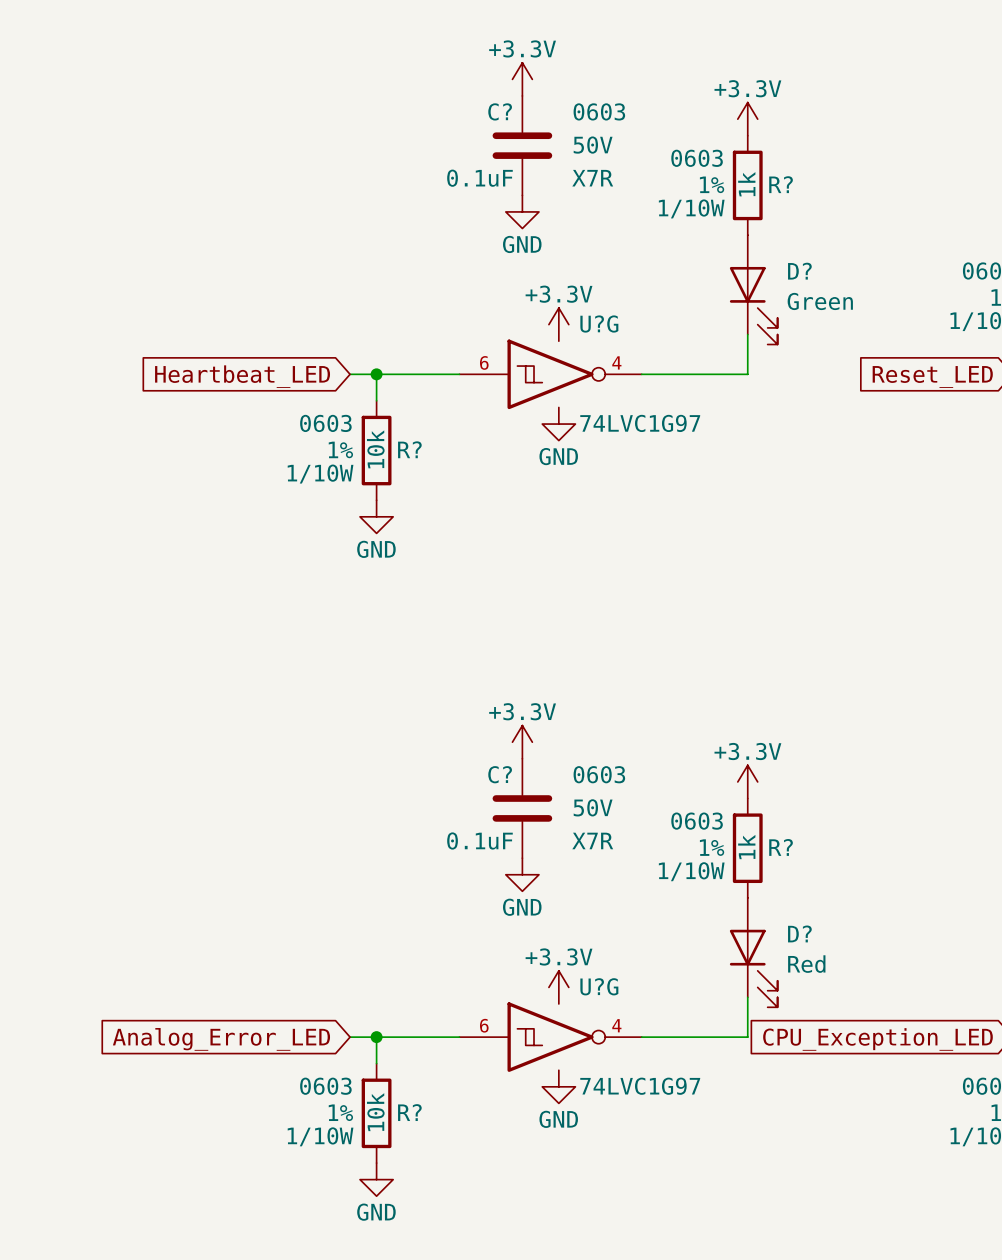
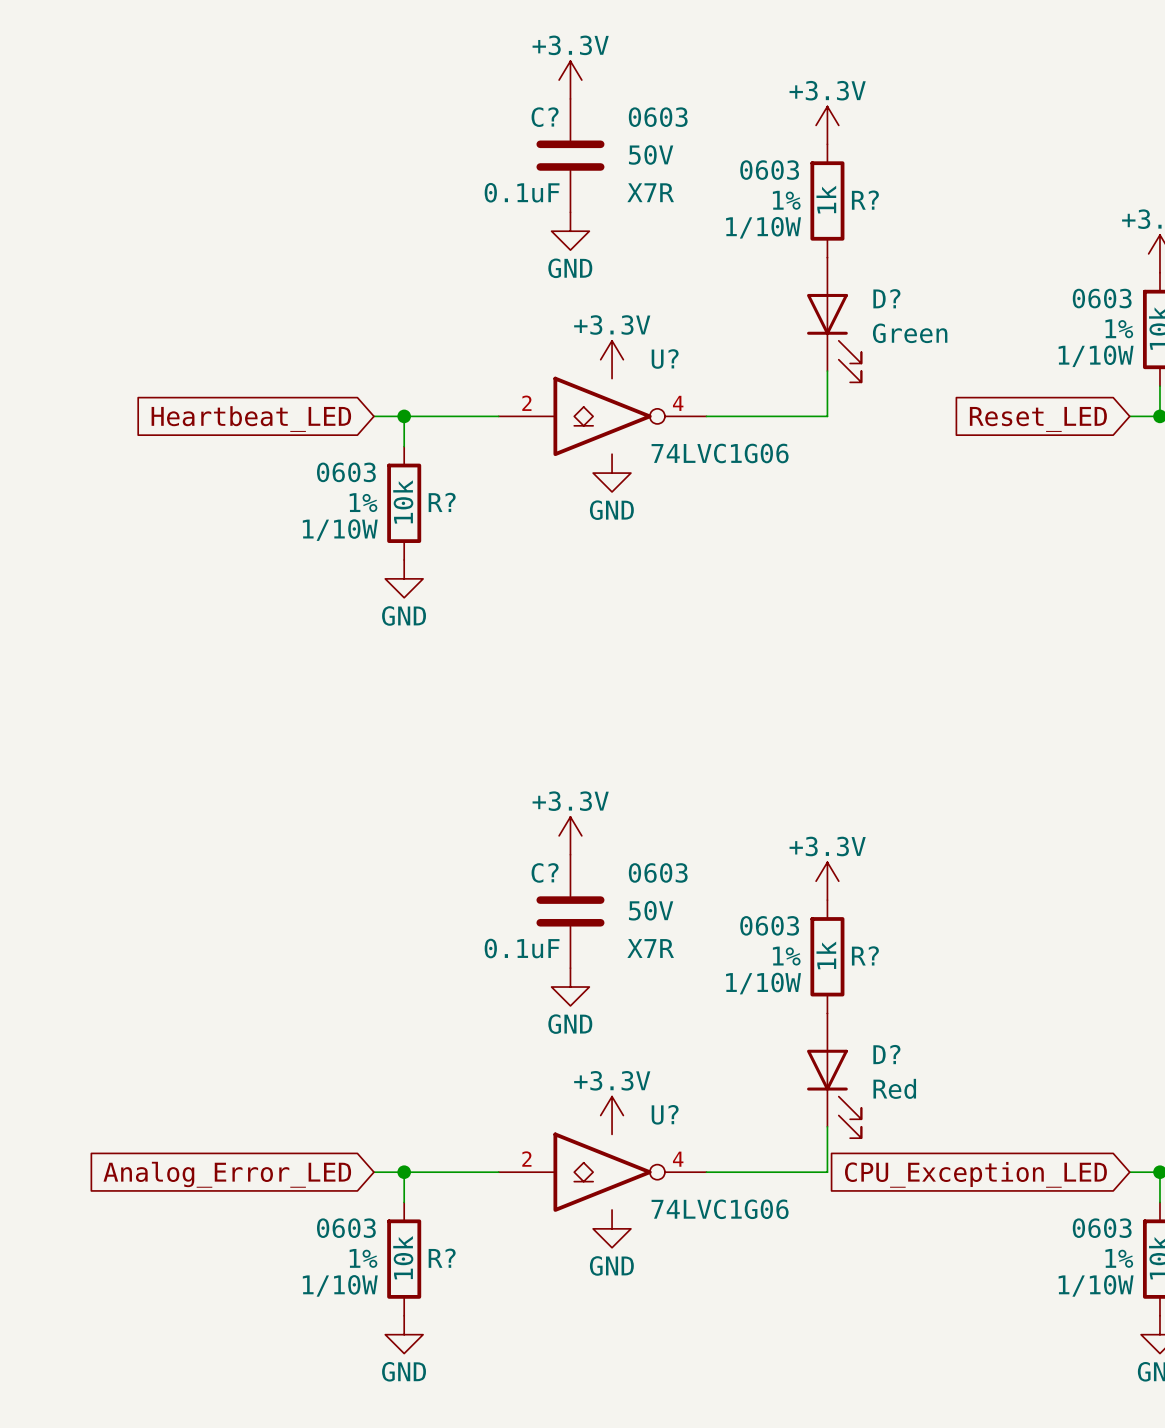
U?G: 74LVC1G97 (550, 374) -> none
U?: none -> 74LVC1G06 (602, 416)
U?G: 74LVC1G97 (550, 1037) -> none
U?: none -> 74LVC1G06 (602, 1172)

